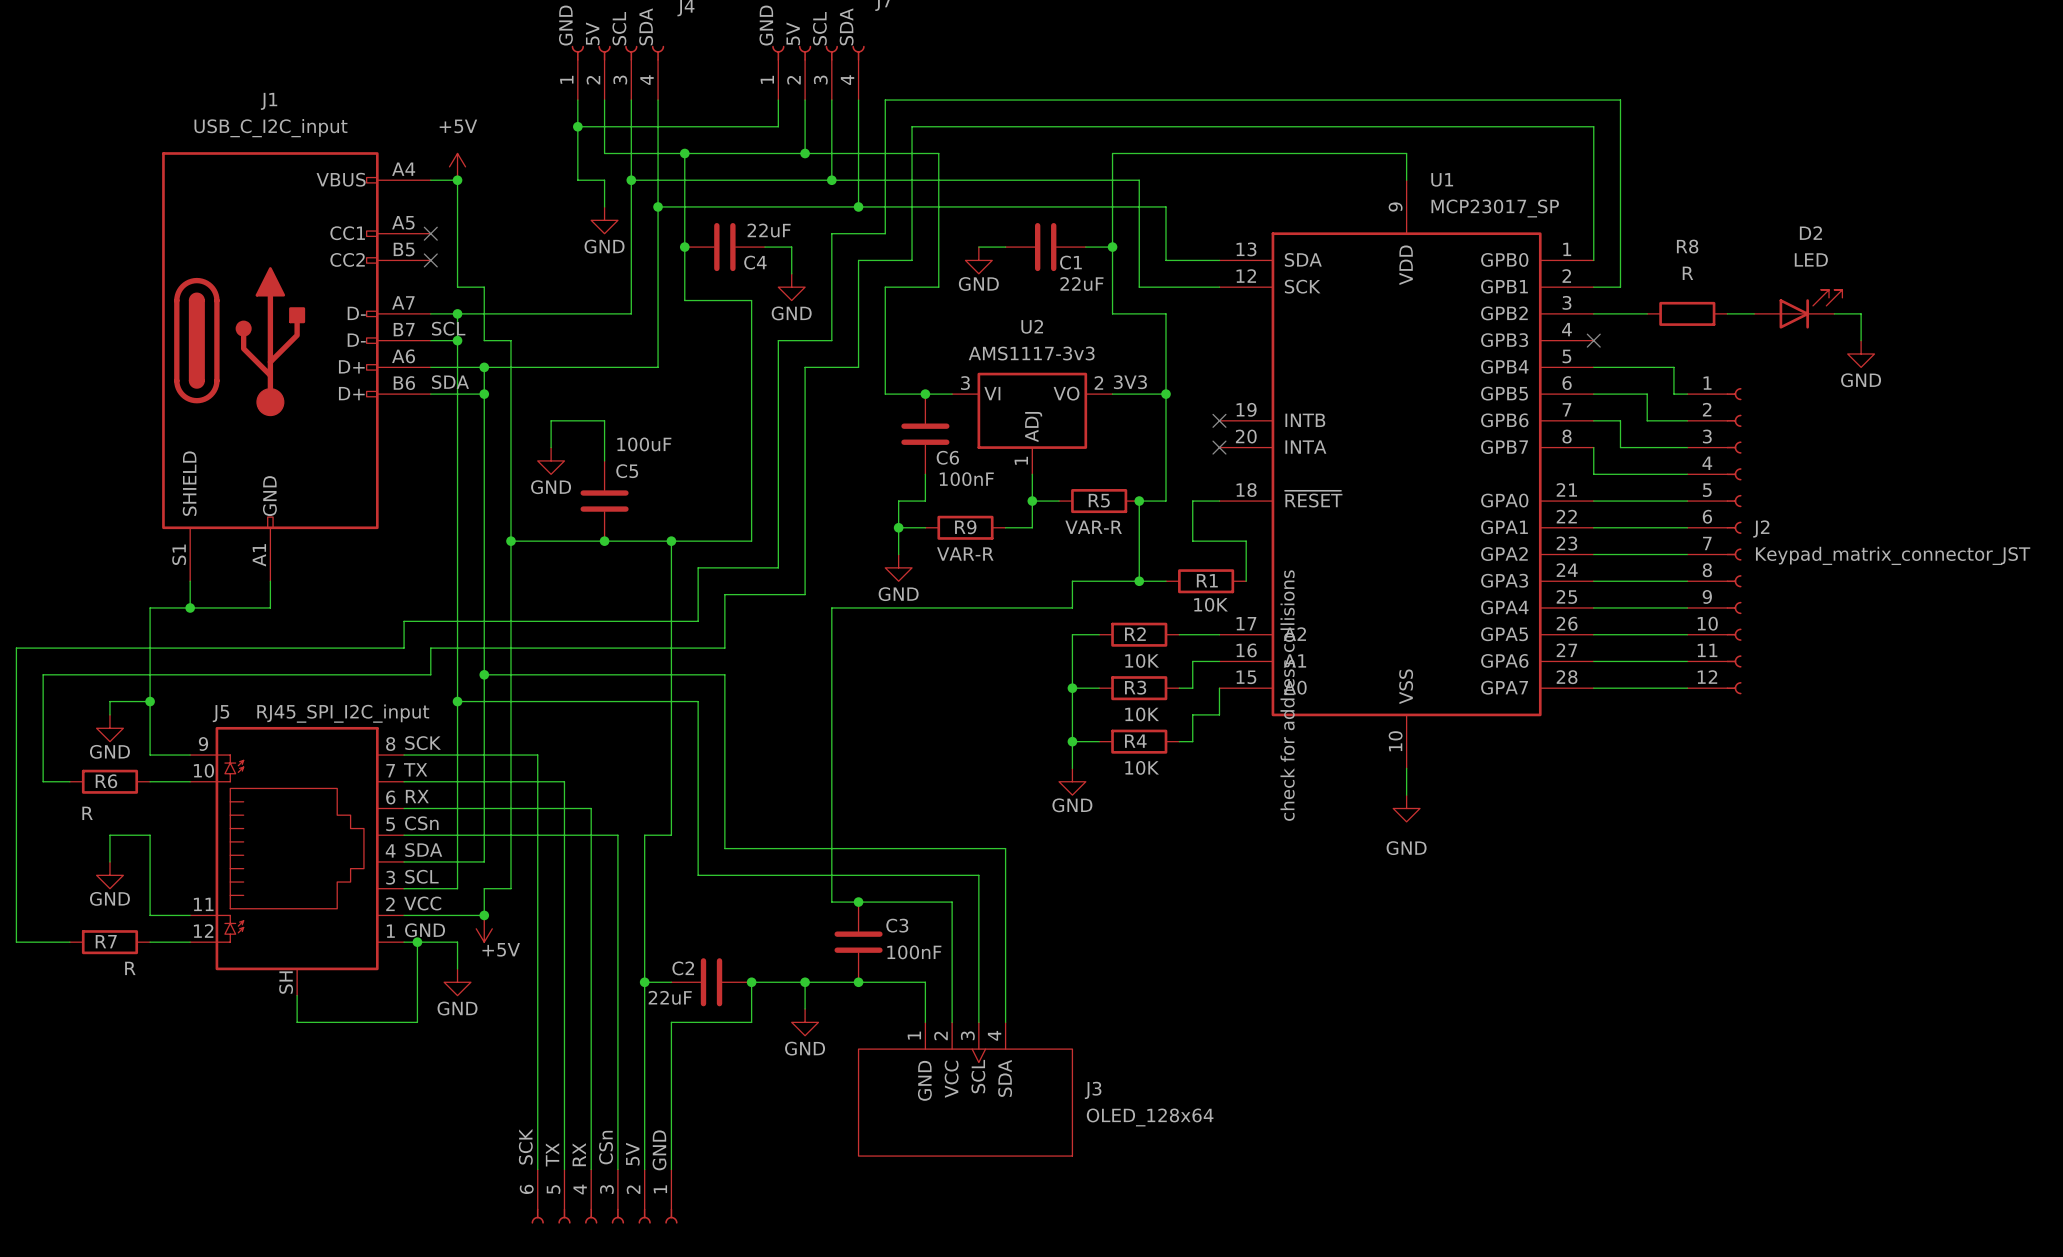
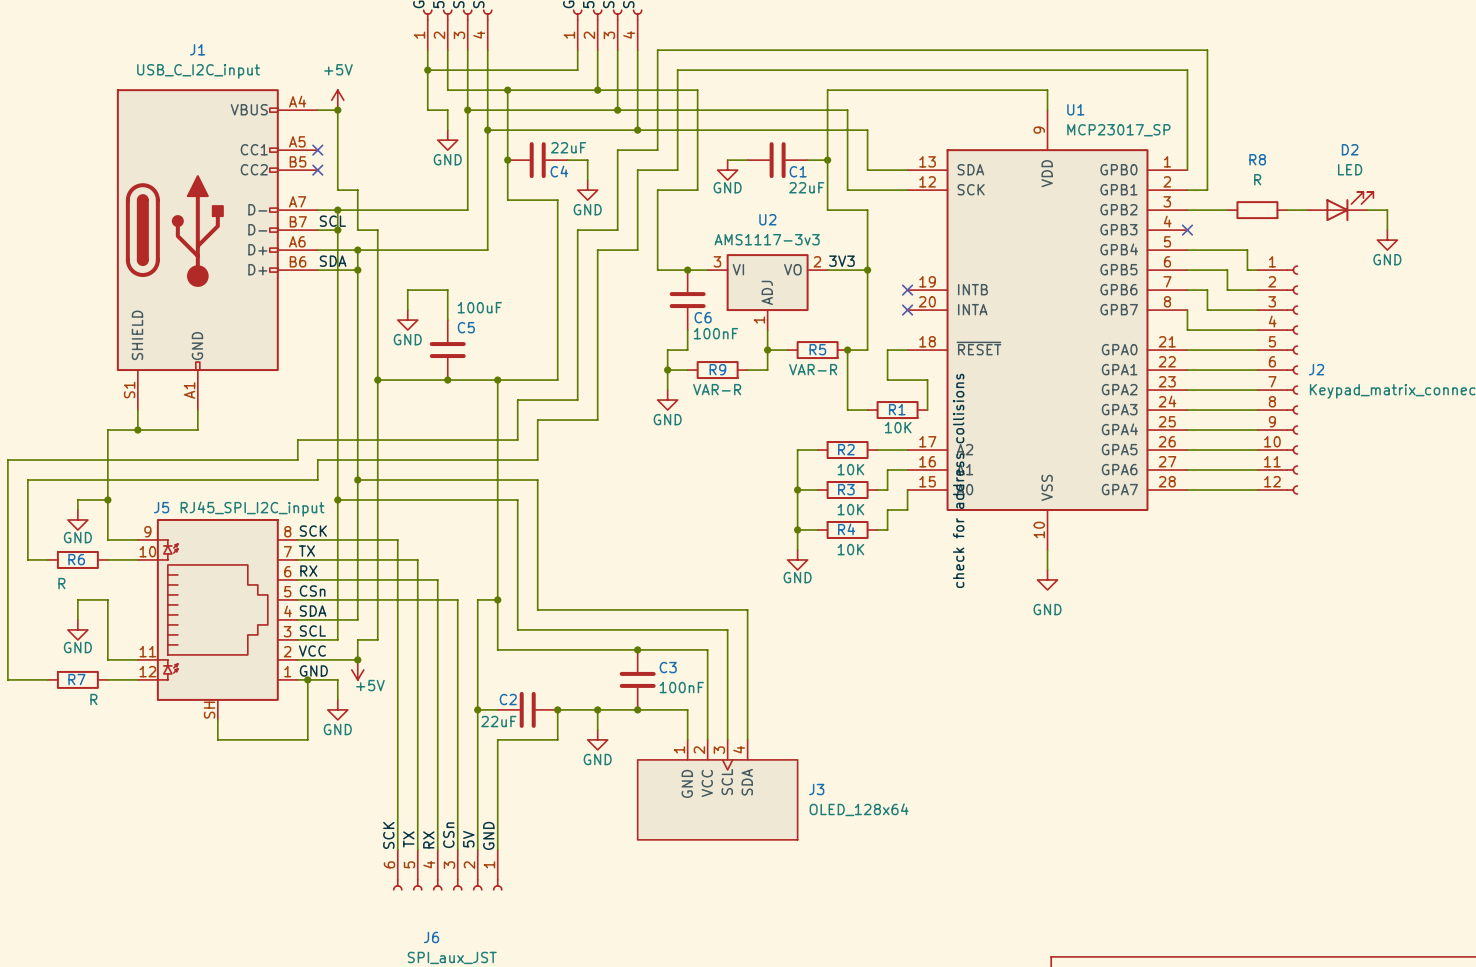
wire: (1139, 581) (1072, 581) (1072, 607) (831, 607) (831, 902) -> (497, 599) (497, 649) (617, 649)
junction: (1139, 581) -> none
junction: none -> (497, 599)

